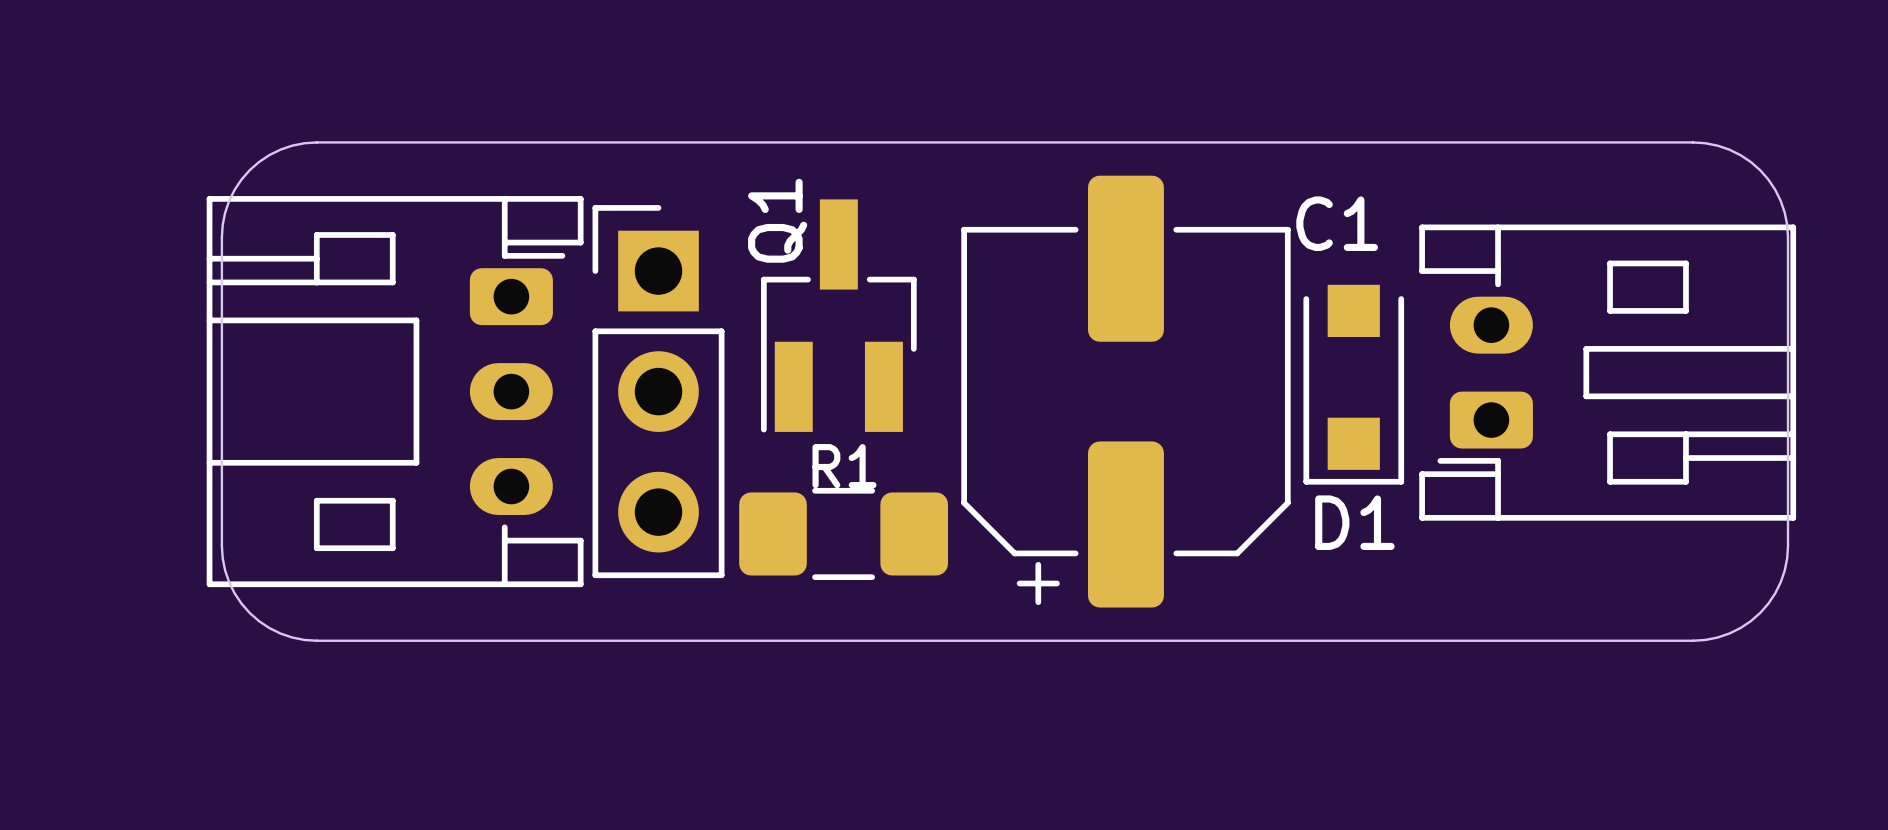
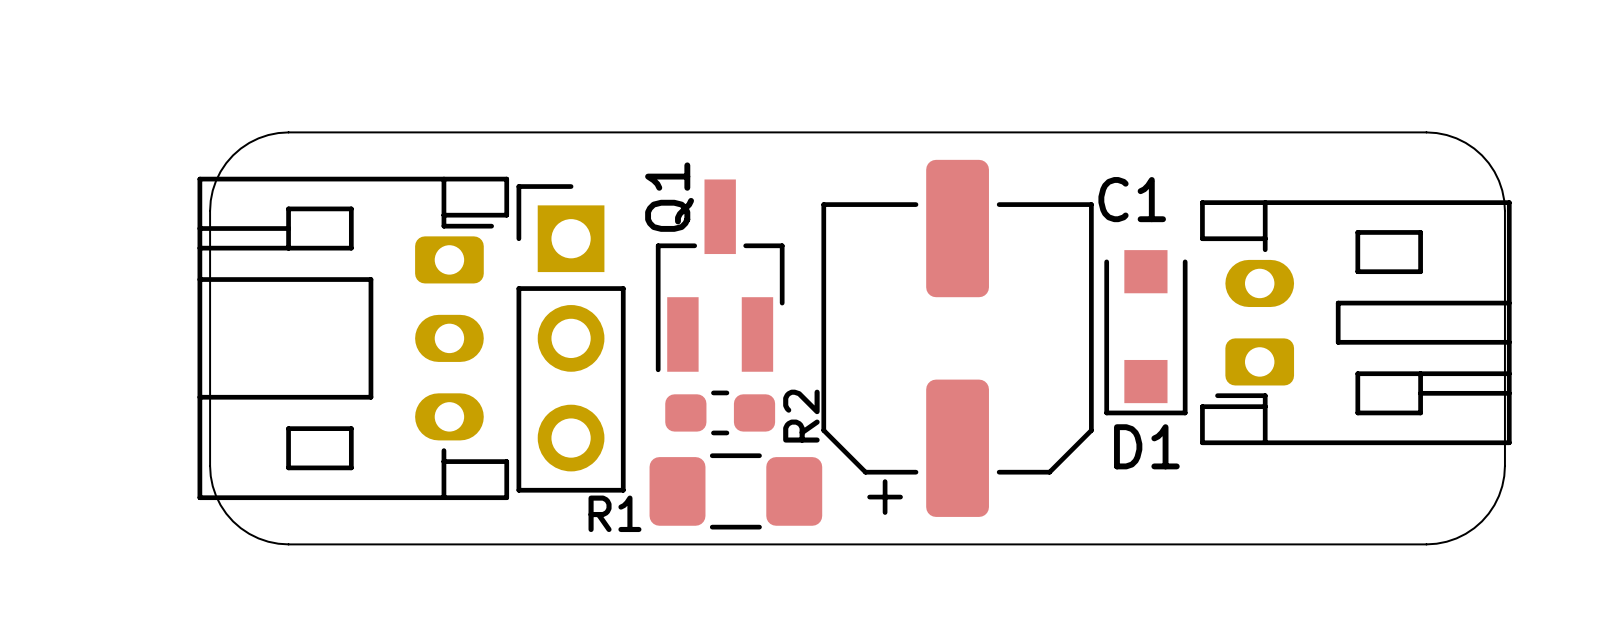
R1 name position: R1 (844, 466) -> R1 (614, 513)
R2: none -> (720, 412)
R1 position: (843, 533) -> (735, 491)

